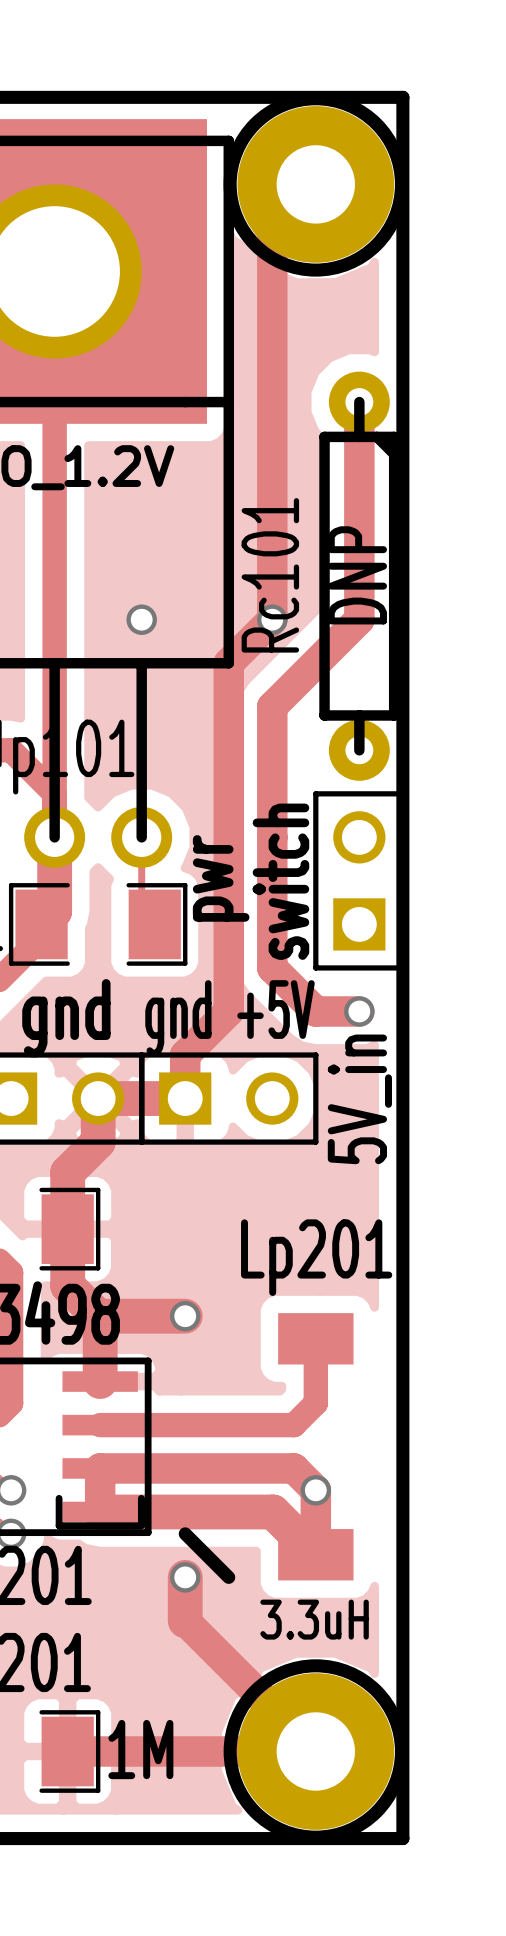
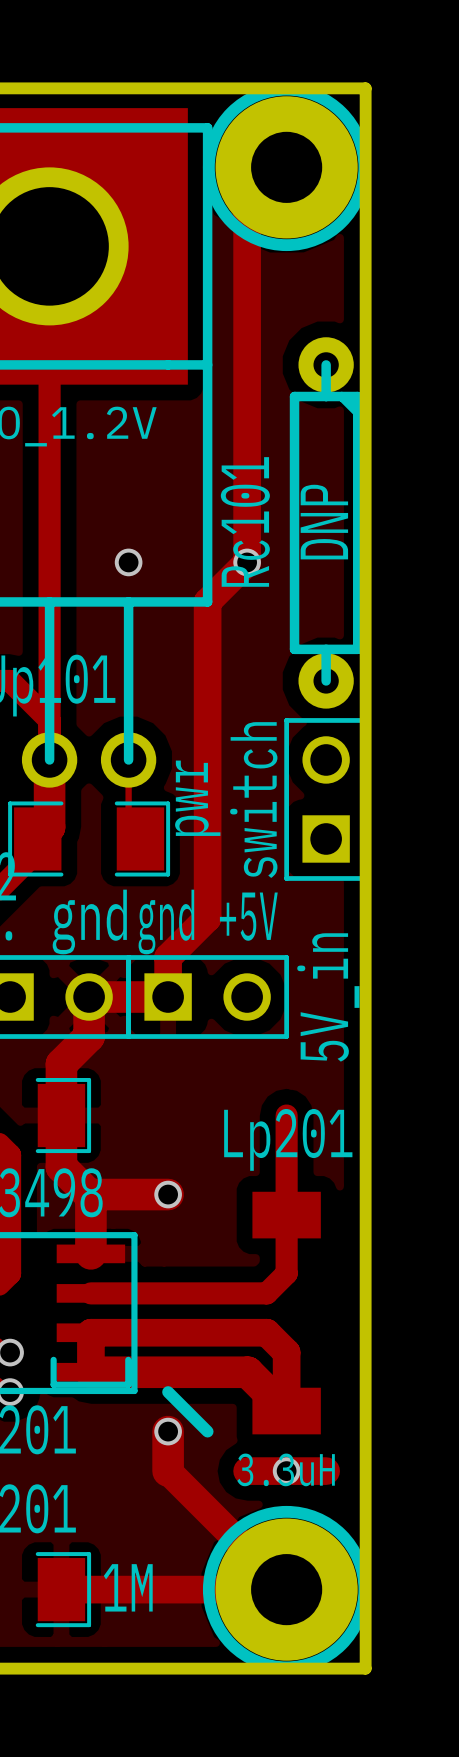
track: (359, 402) (359, 619) (272, 706) (272, 967) (315, 1011) (359, 1011) -> none
via: (359, 1011) -> none
track: none -> (286, 1115) (286, 1215)
via position: (315, 1490) -> (286, 1471)
track: none -> (247, 1471) (326, 1471)

